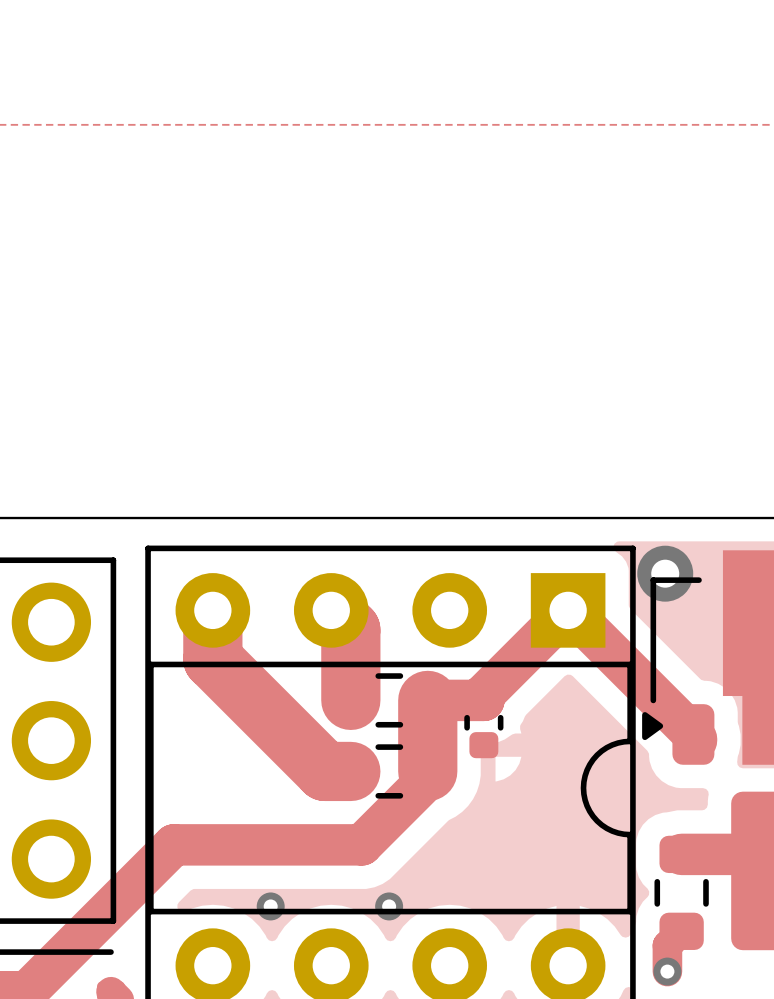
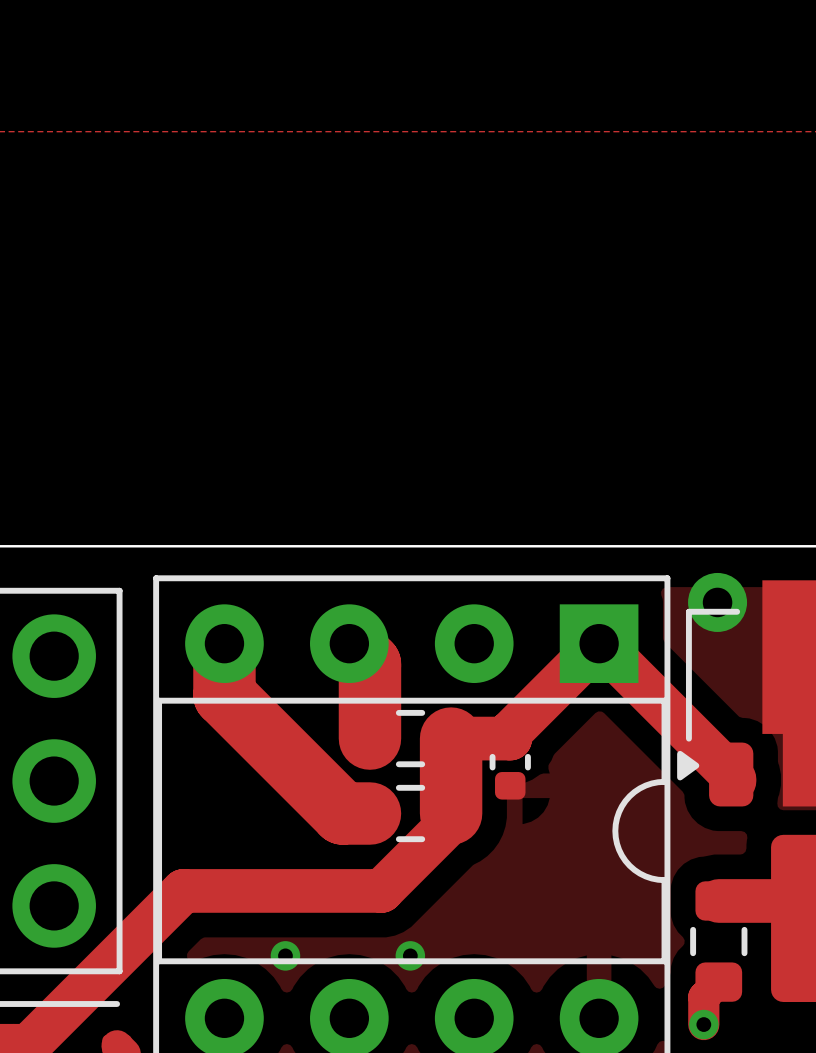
via position: (665, 573) -> (717, 602)

